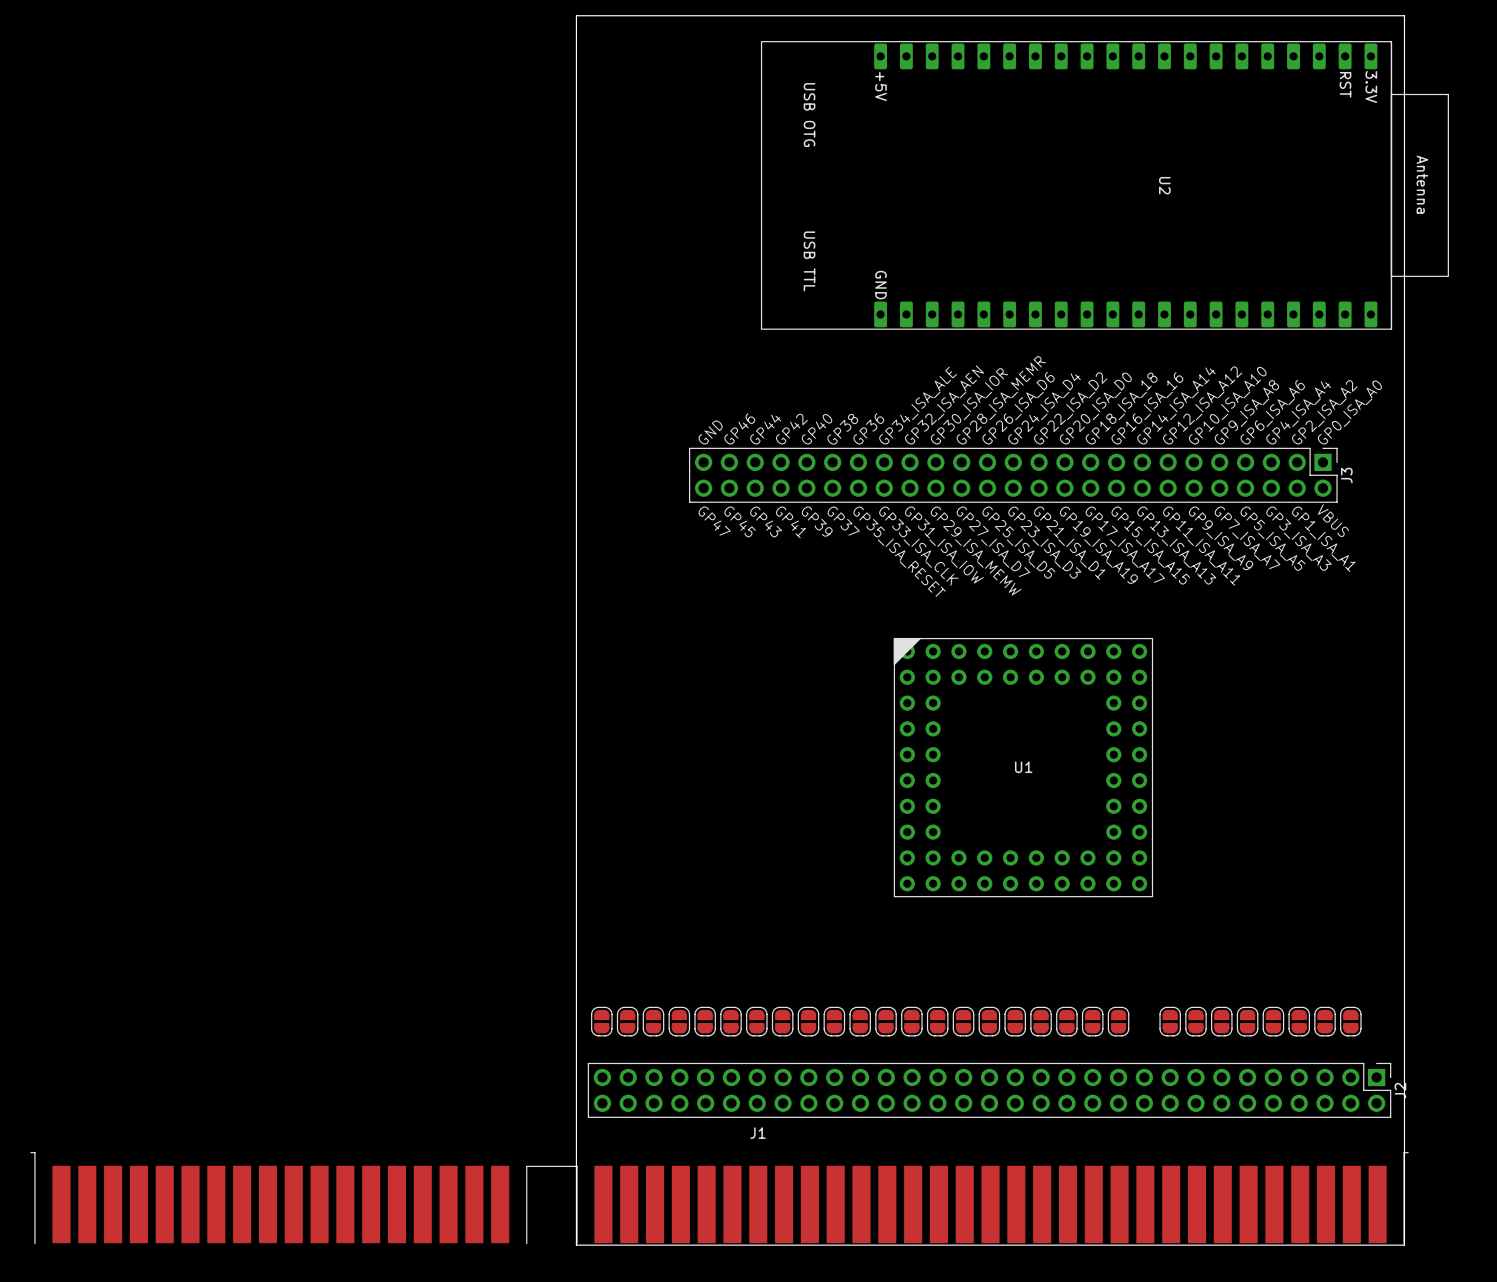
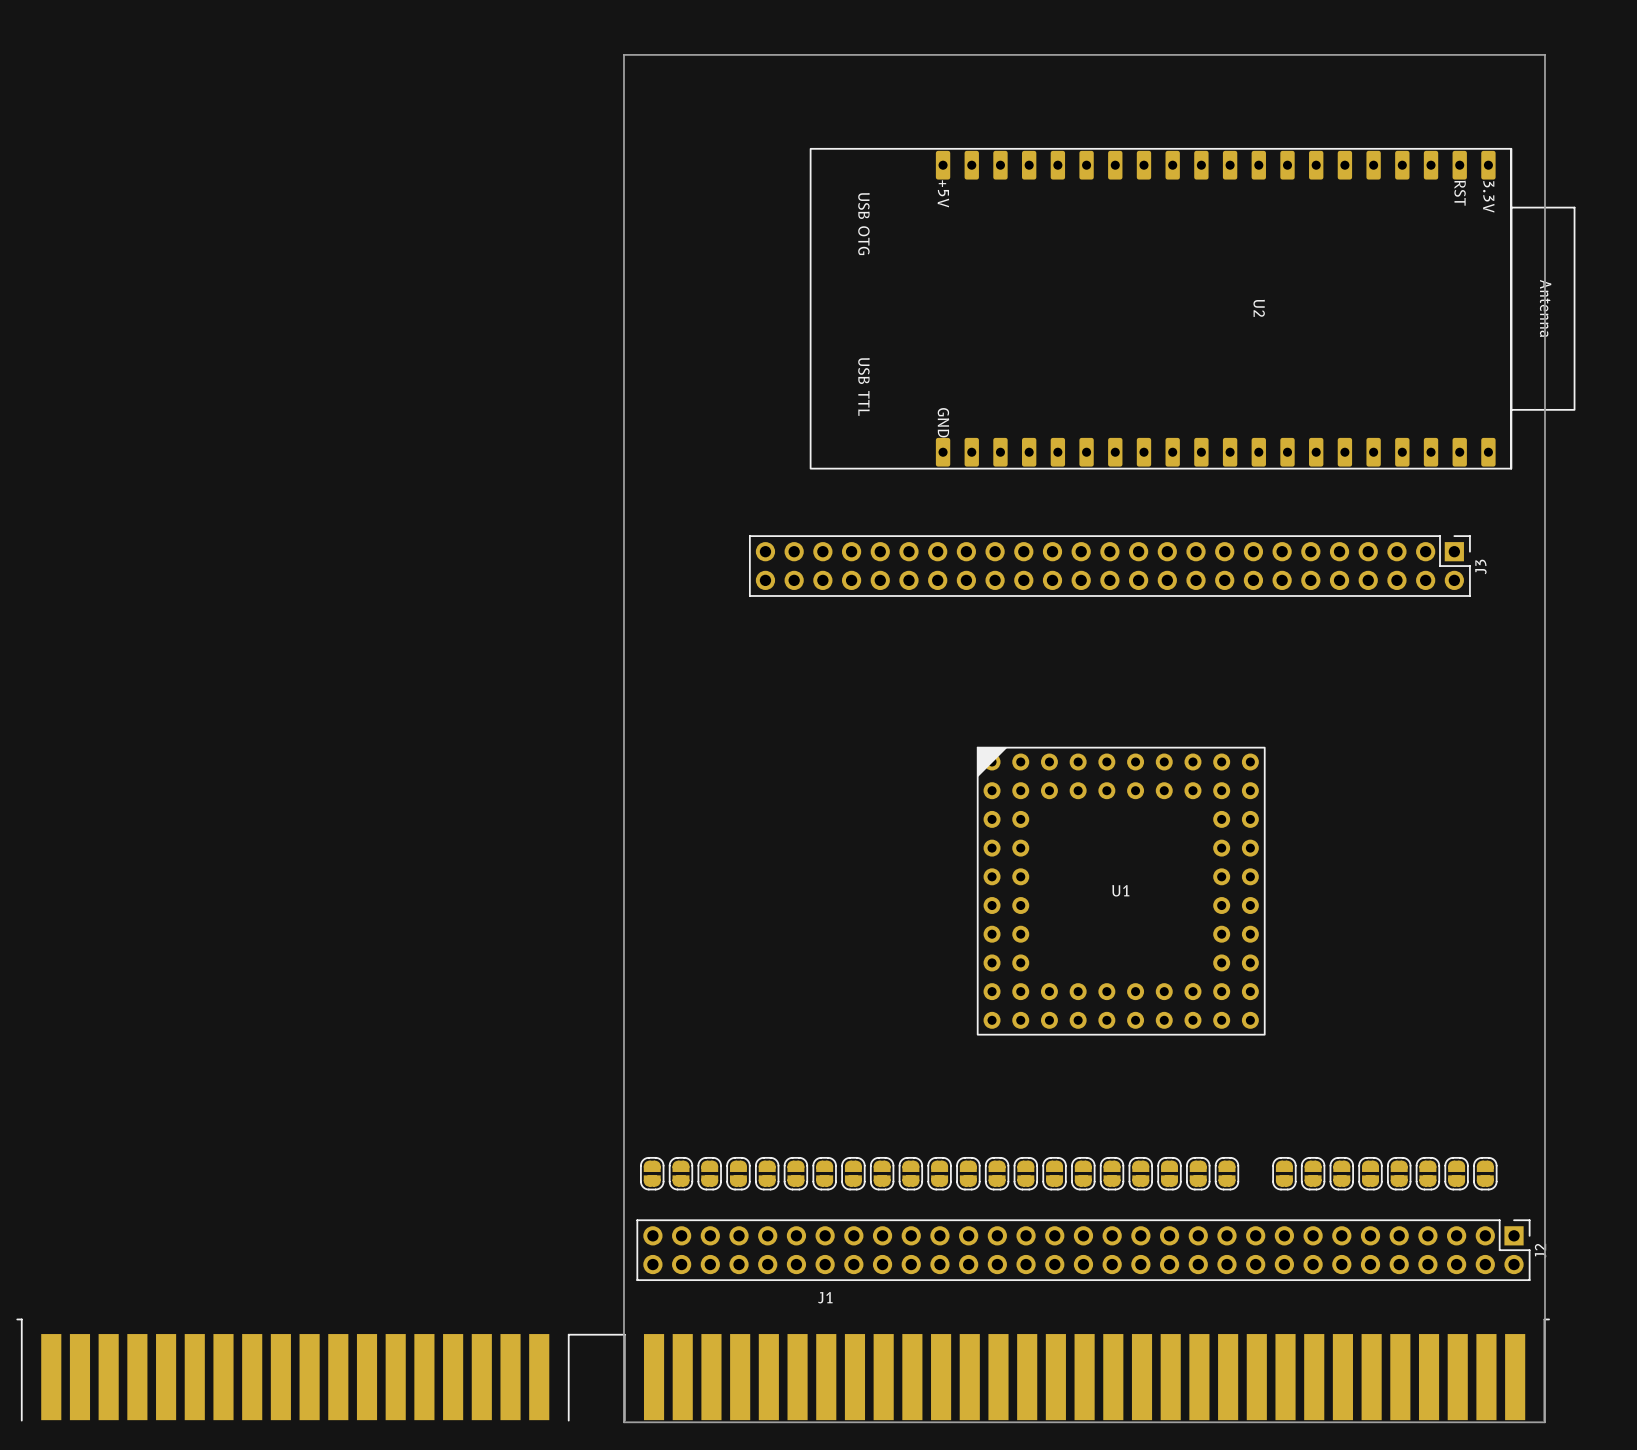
U2 position: (1104, 185) -> (1192, 308)
text: GP28_ISA_MEMR (1001, 400) -> none
text: GP32_ISA_AEN (944, 404) -> none
text: GP34_ISA_ALE (918, 405) -> none
text: GP14_ISA_A14 (1176, 405) -> none
text: GP12_ISA_A12 (1202, 405) -> none
text: GP10_ISA_A10 (1227, 405) -> none
text: GP30_ISA_IOR (969, 406) -> none
text: GP26_ISA_D6 (1018, 408) -> none
text: GP24_ISA_D4 (1044, 408) -> none
text: GP22_ISA_D2 (1070, 408) -> none
text: GP20_ISA_D0 (1095, 408) -> none
text: GP18_ISA_18 (1121, 408) -> none
text: GP16_ISA_16 (1147, 408) -> none
text: GP9_ISA_A8 (1246, 412) -> none
text: GP6_ISA_A6 (1272, 412) -> none
text: GP4_ISA_A4 (1298, 412) -> none
text: GP2_ISA_A2 (1324, 412) -> none
text: GP0_ISA_A0 (1349, 412) -> none
text: GP46 (739, 428) -> none
text: GP36 (868, 428) -> none
text: GP44 (765, 429) -> none
text: GP42 (791, 429) -> none
text: GP40 (817, 429) -> none
text: GP38 (842, 429) -> none
text: GND (710, 432) -> none
text: VBUS (1333, 520) -> none
text: GP47 (714, 521) -> none
text: GP45 (740, 521) -> none
text: GP43 (766, 521) -> none
text: GP39 (817, 521) -> none
text: GP37 (843, 521) -> none
text: GP41 (790, 522) -> none
text: GP7_ISA_A7 (1247, 537) -> none
text: GP9_ISA_A9 (1221, 538) -> none
text: GP5_ISA_A5 (1273, 538) -> none
text: GP3_ISA_A3 (1299, 538) -> none
text: GP1_ISA_A1 (1323, 539) -> none
text: GP27_ISA_D7 (993, 541) -> none
text: GP25_ISA_D5 (1018, 542) -> none
text: GP23_ISA_D3 (1044, 542) -> none
text: GP21_ISA_D1 (1069, 543) -> none
text: GP17_ISA_A17 (1125, 544) -> none
text: GP31_ISA_IOW (944, 545) -> none
text: GP19_ISA_A19 (1098, 545) -> none
text: GP15_ISA_A15 (1150, 545) -> none
text: GP13_ISA_A13 (1176, 545) -> none
text: GP33_ISA_CLK (918, 546) -> none
text: GP11_ISA_A11 (1201, 546) -> none
text: GP35_ISA_RESET (899, 551) -> none
text: GP29_ISA_MEMW (976, 551) -> none

